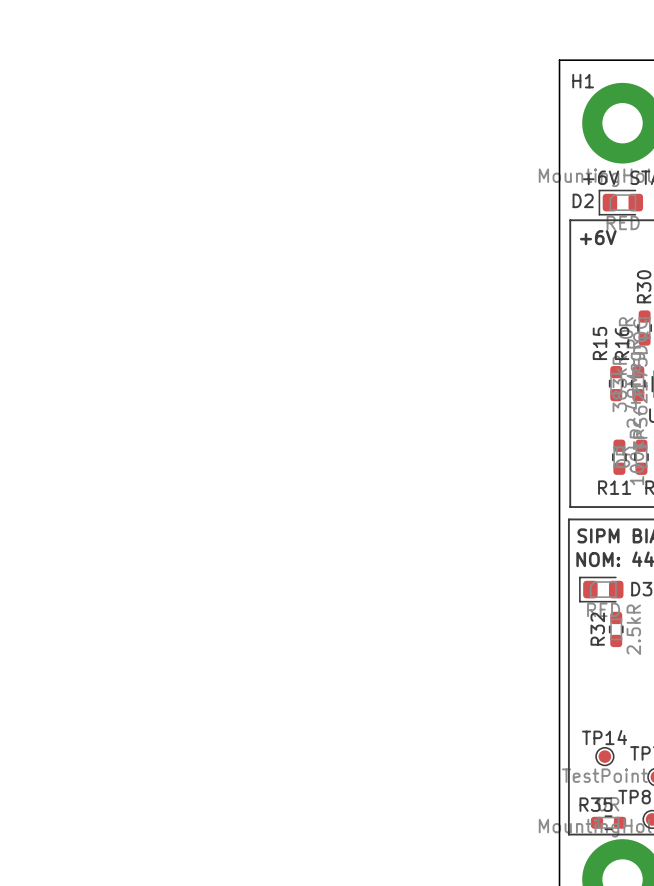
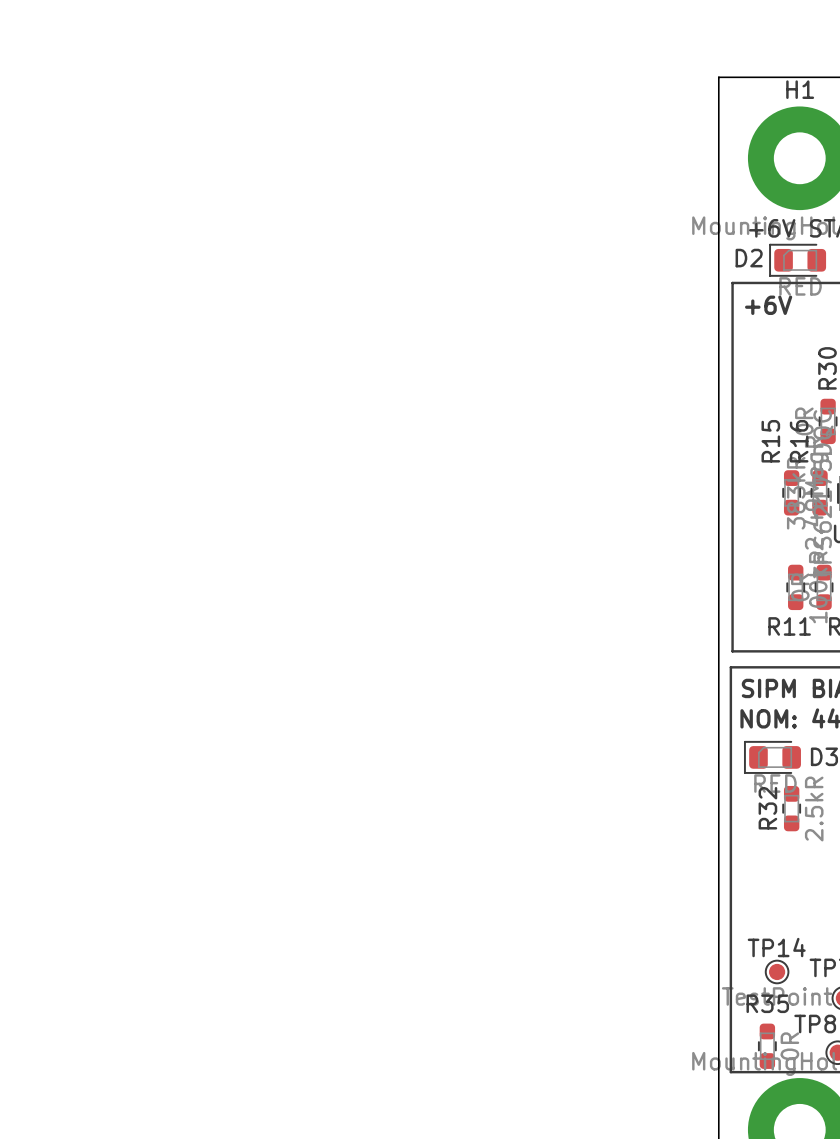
H1 name position: H1 (583, 81) -> H1 (800, 89)
R35 rotation: 0° (608, 822) -> 90° clockwise (767, 1046)

